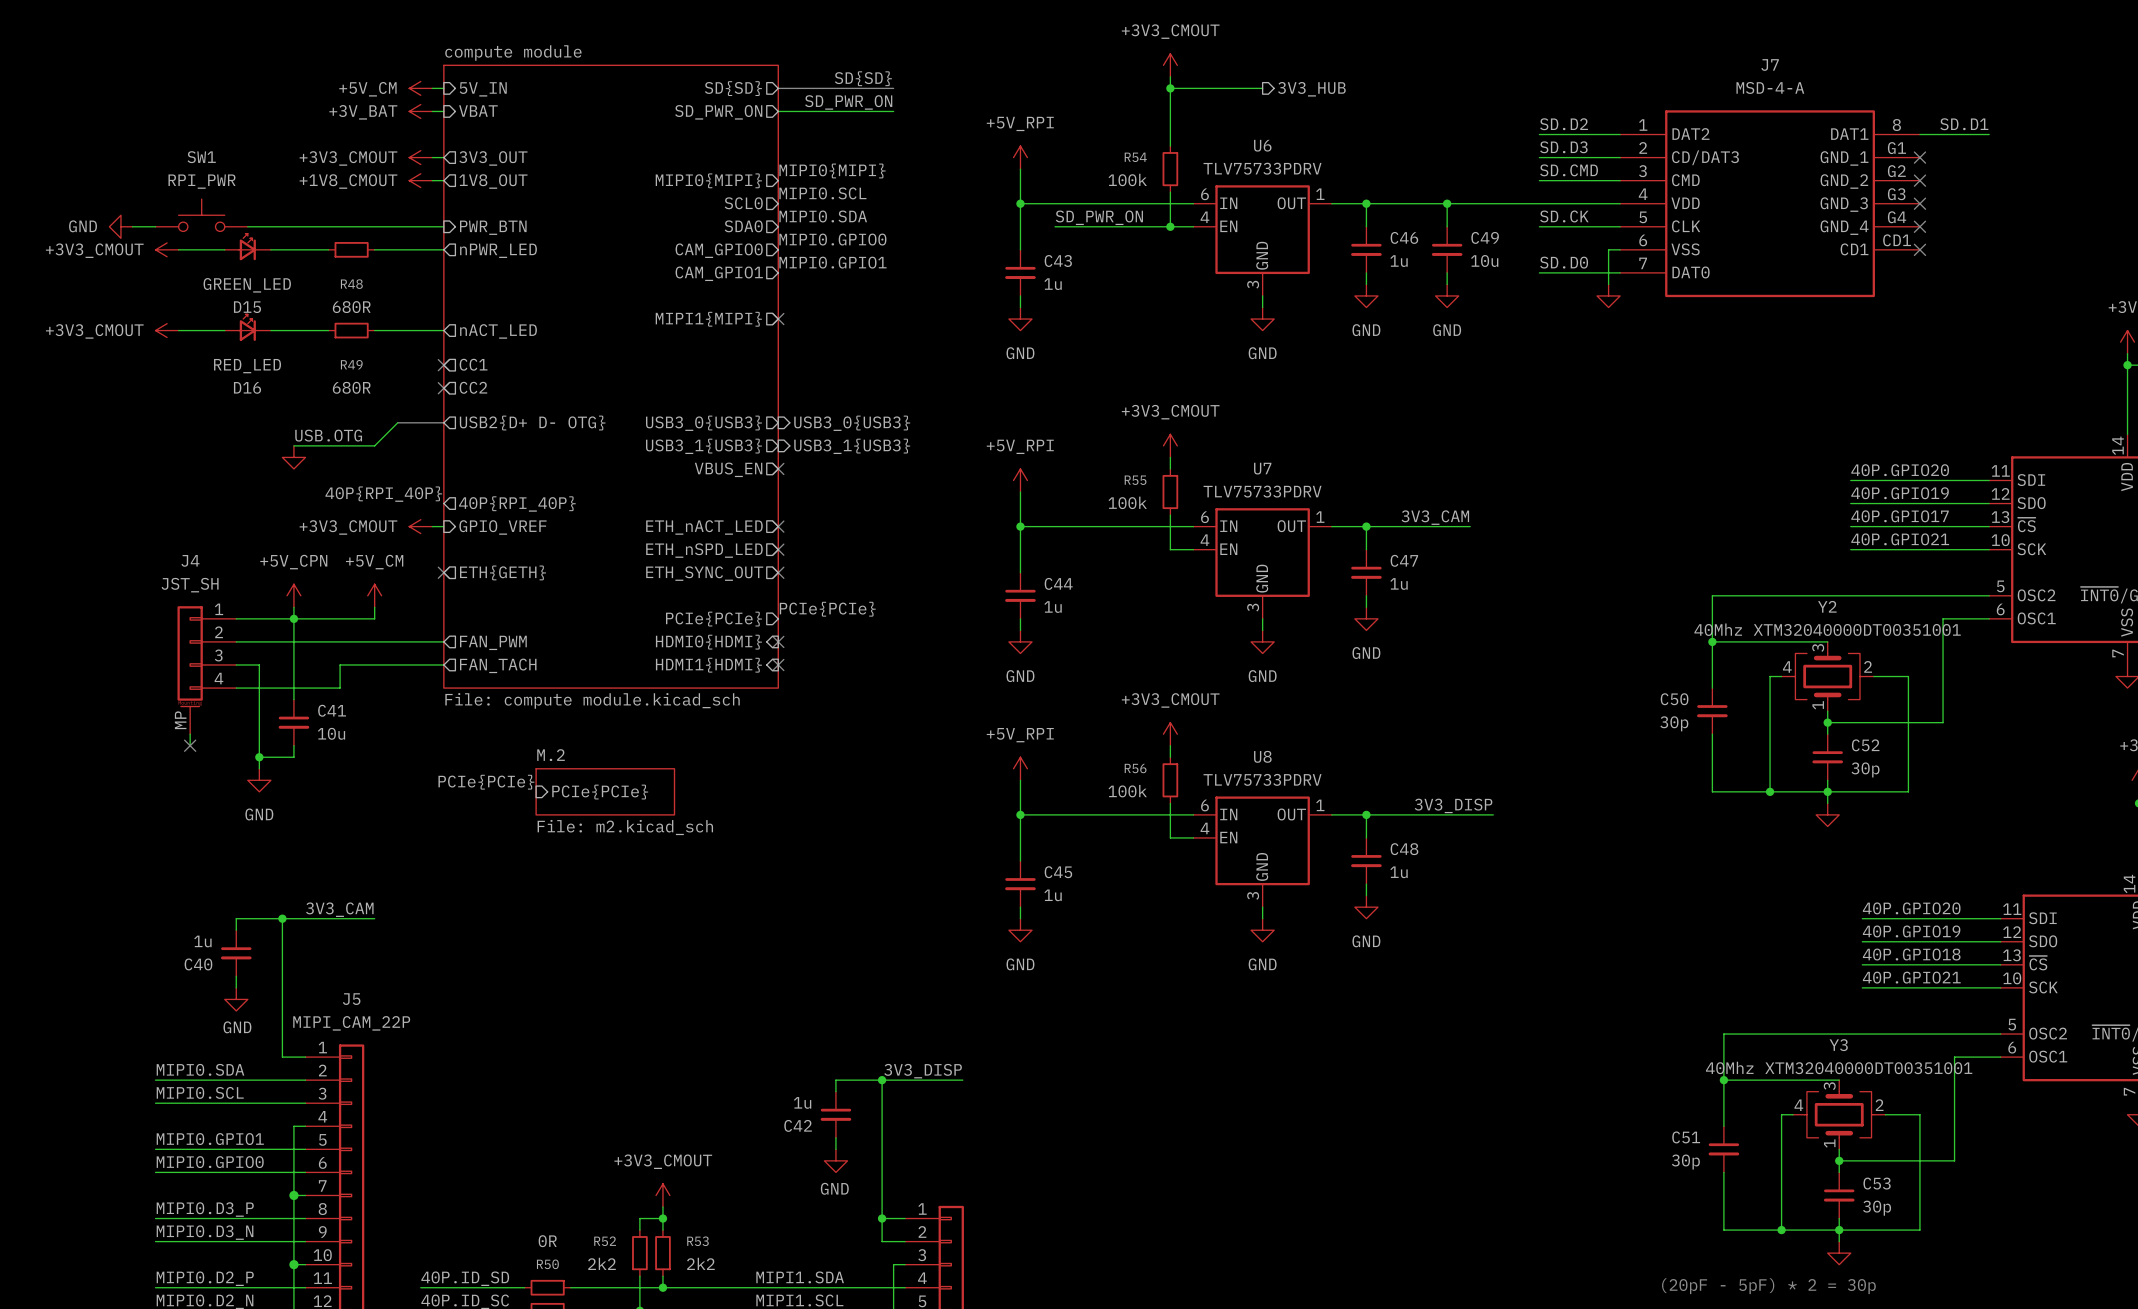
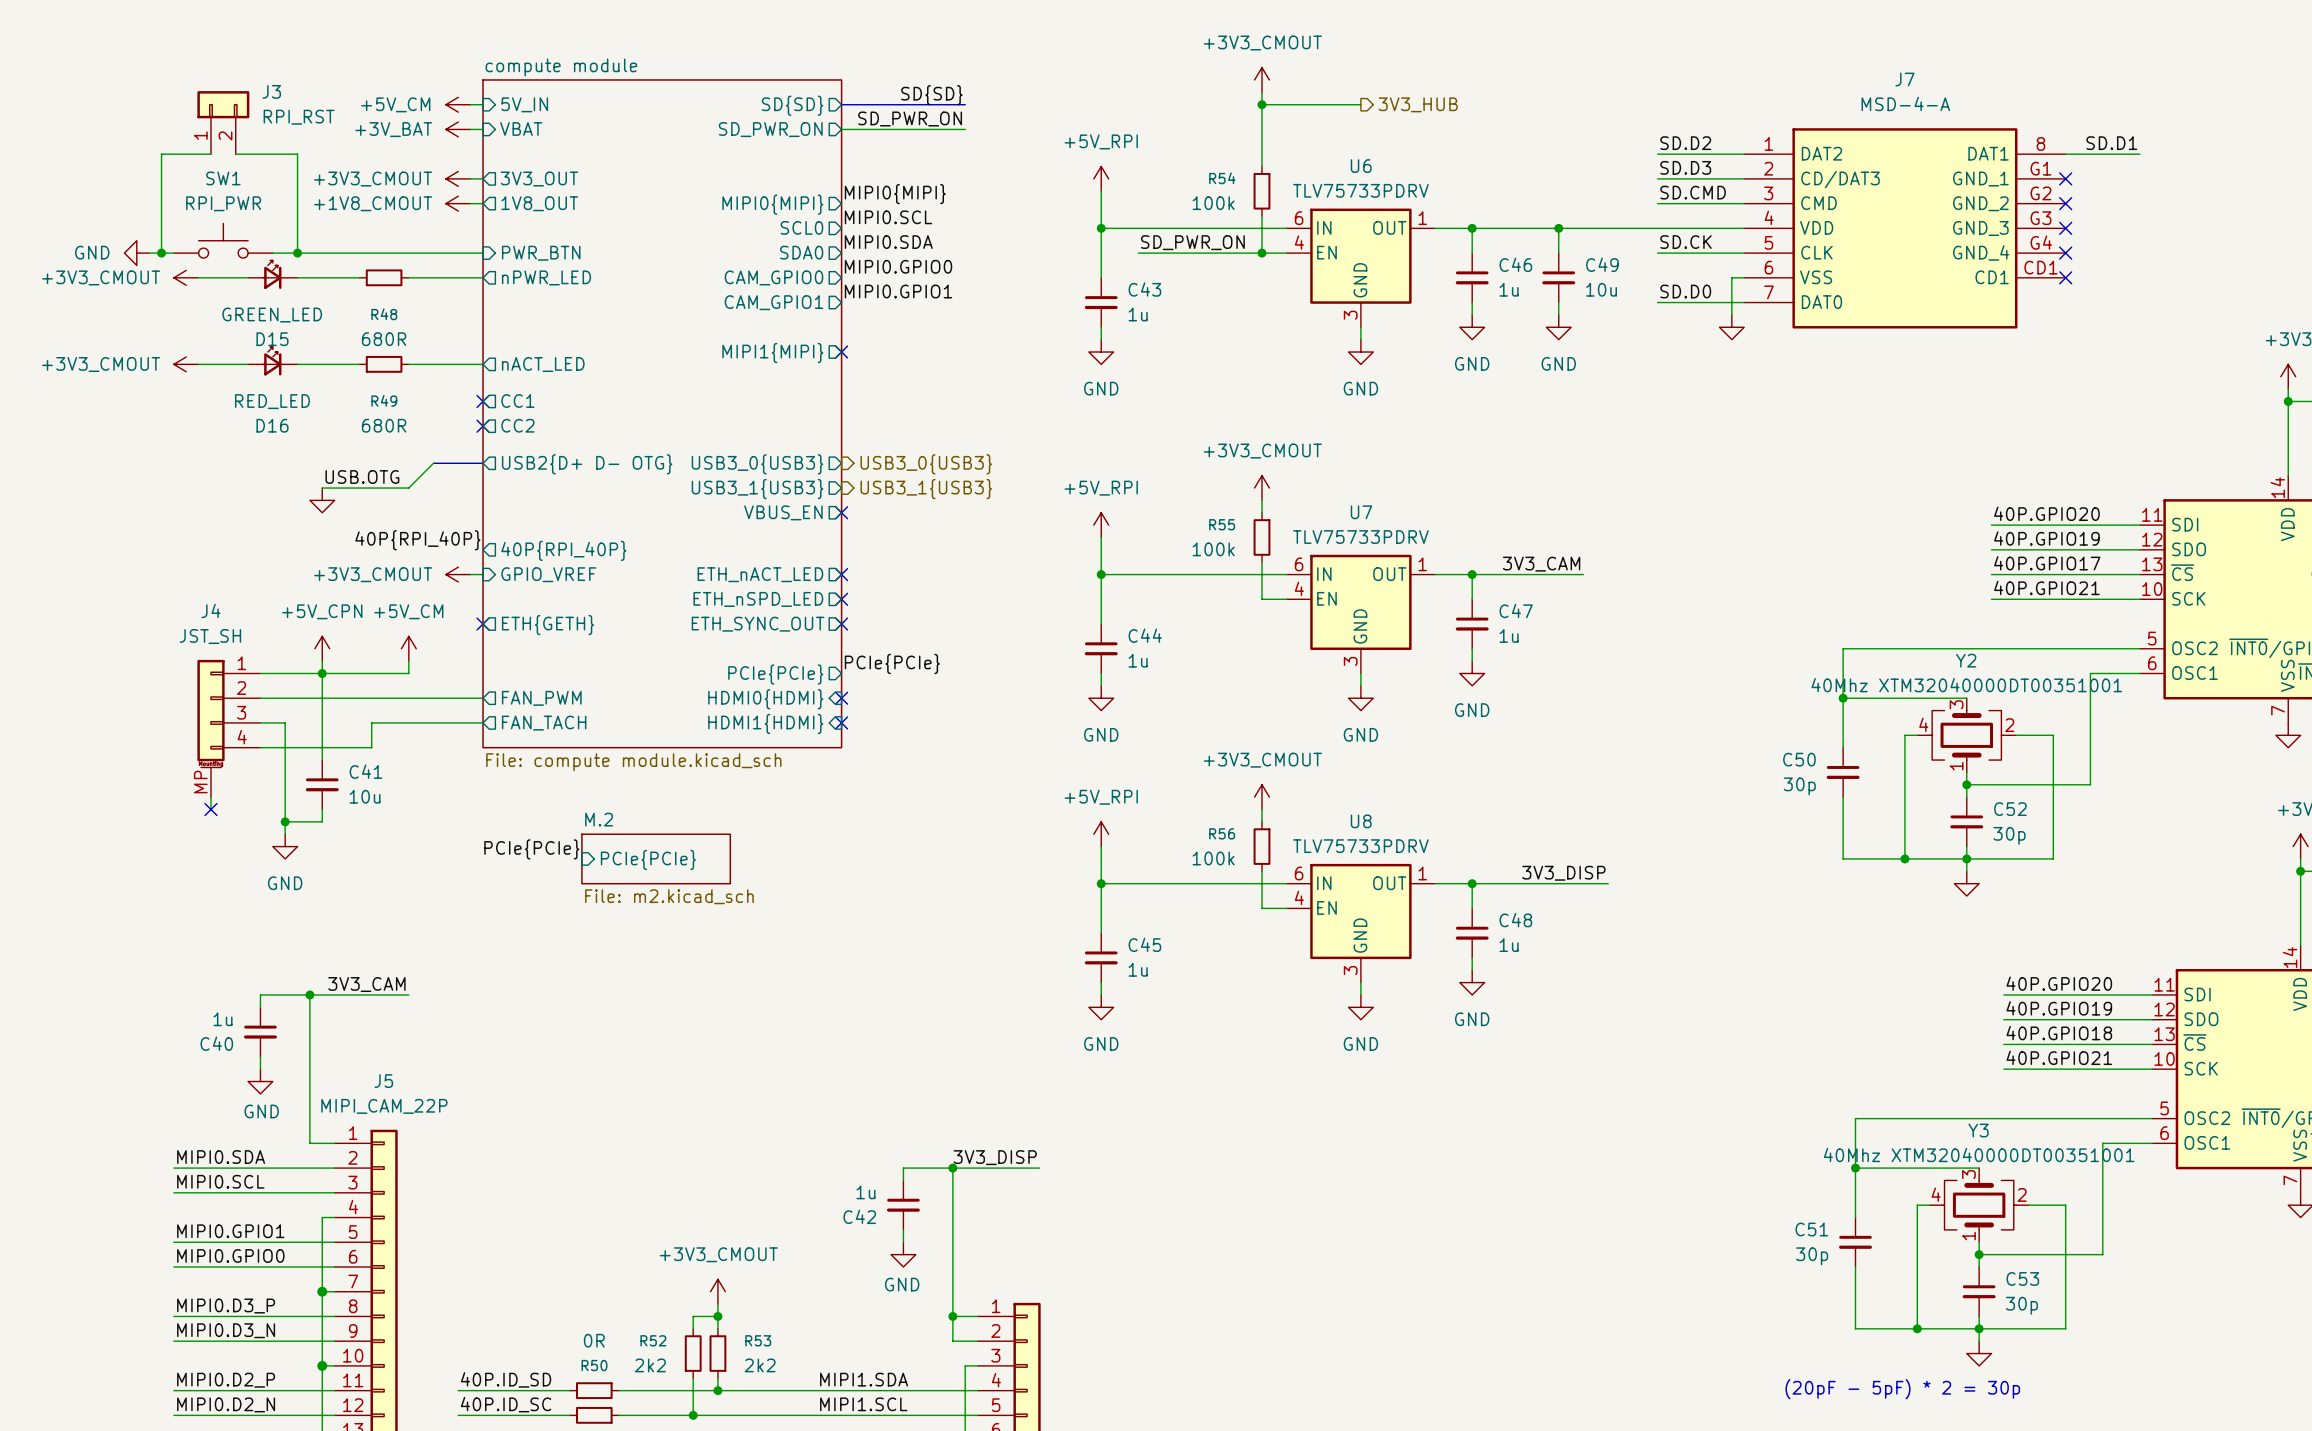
J3: none -> RPI_RST (223, 122)
wire: none -> (210, 154) (161, 154) (161, 253)
wire: none -> (235, 154) (297, 154) (297, 253)
junction: none -> (161, 253)
junction: none -> (297, 253)

